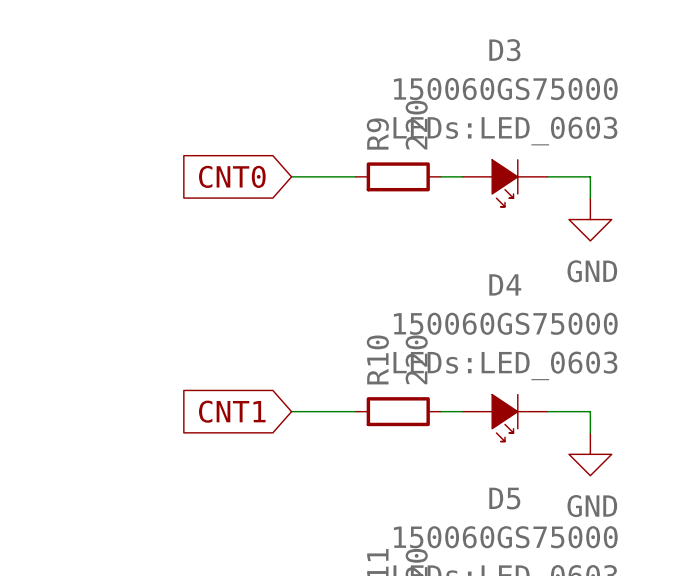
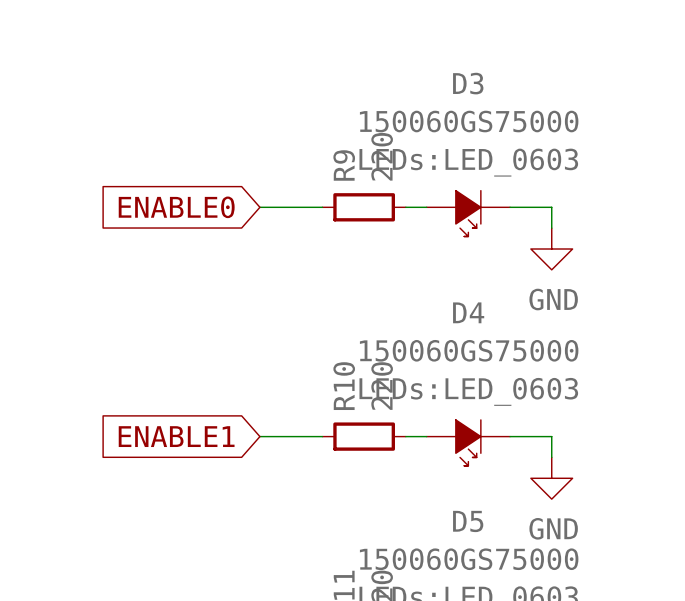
global label: CNT0 (232, 176) -> ENABLE0 (176, 207)
global label: CNT1 (232, 411) -> ENABLE1 (176, 436)

